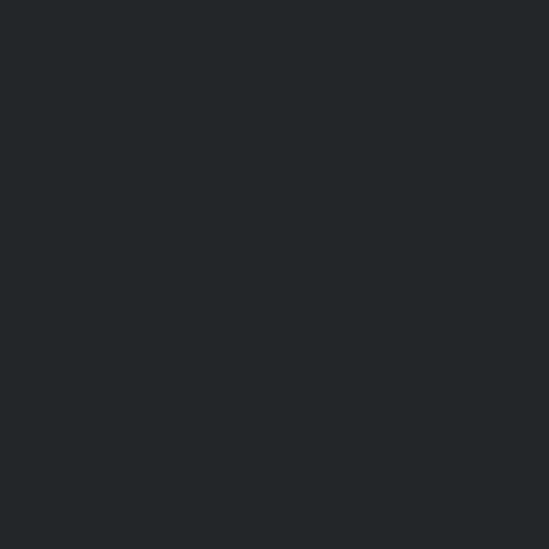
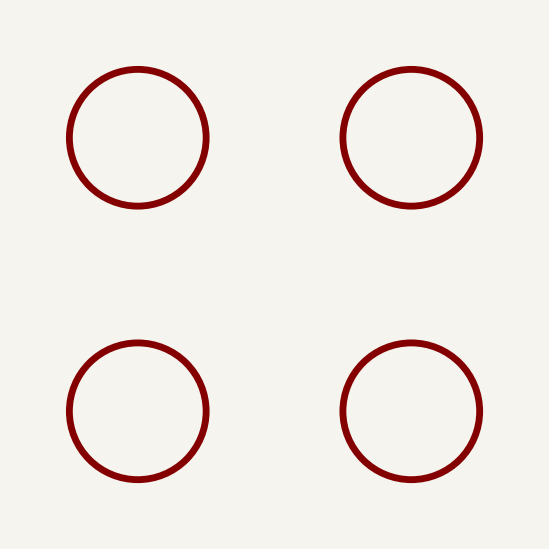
part: none -> (137, 137)
part: none -> (411, 137)
part: none -> (137, 411)
part: none -> (411, 411)

